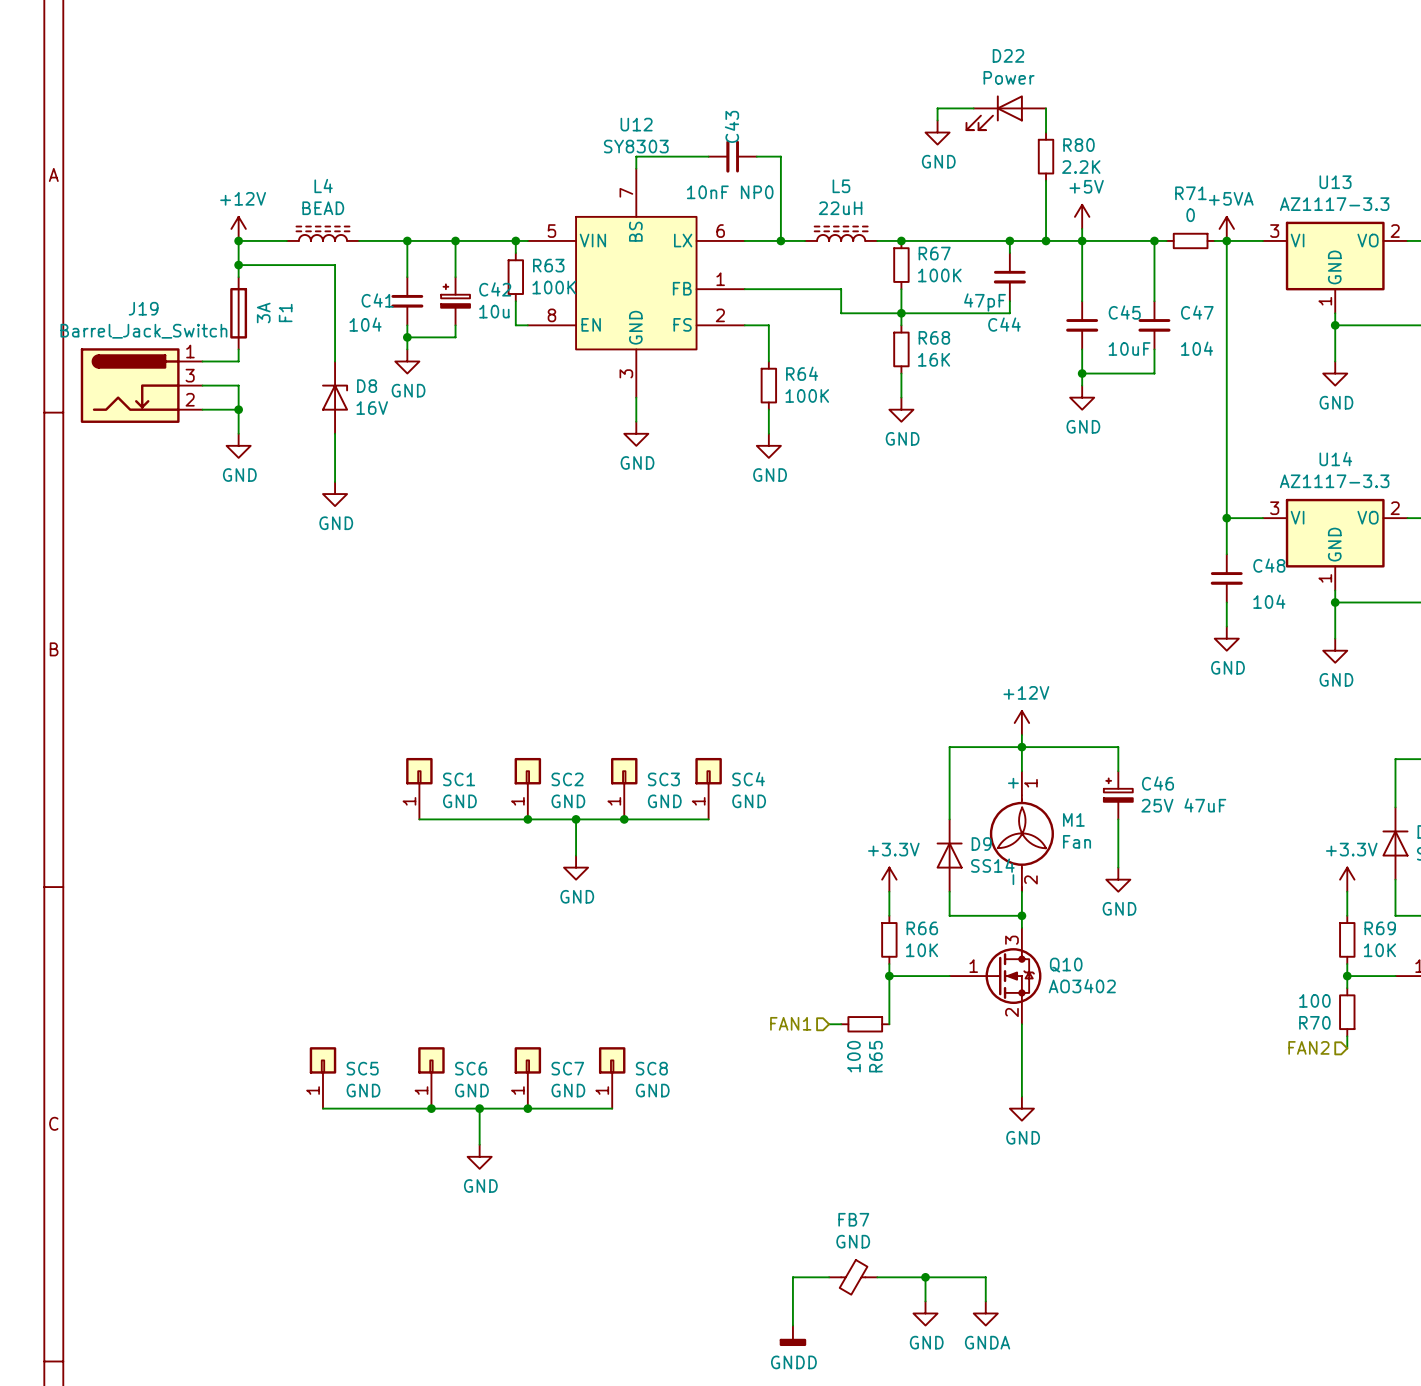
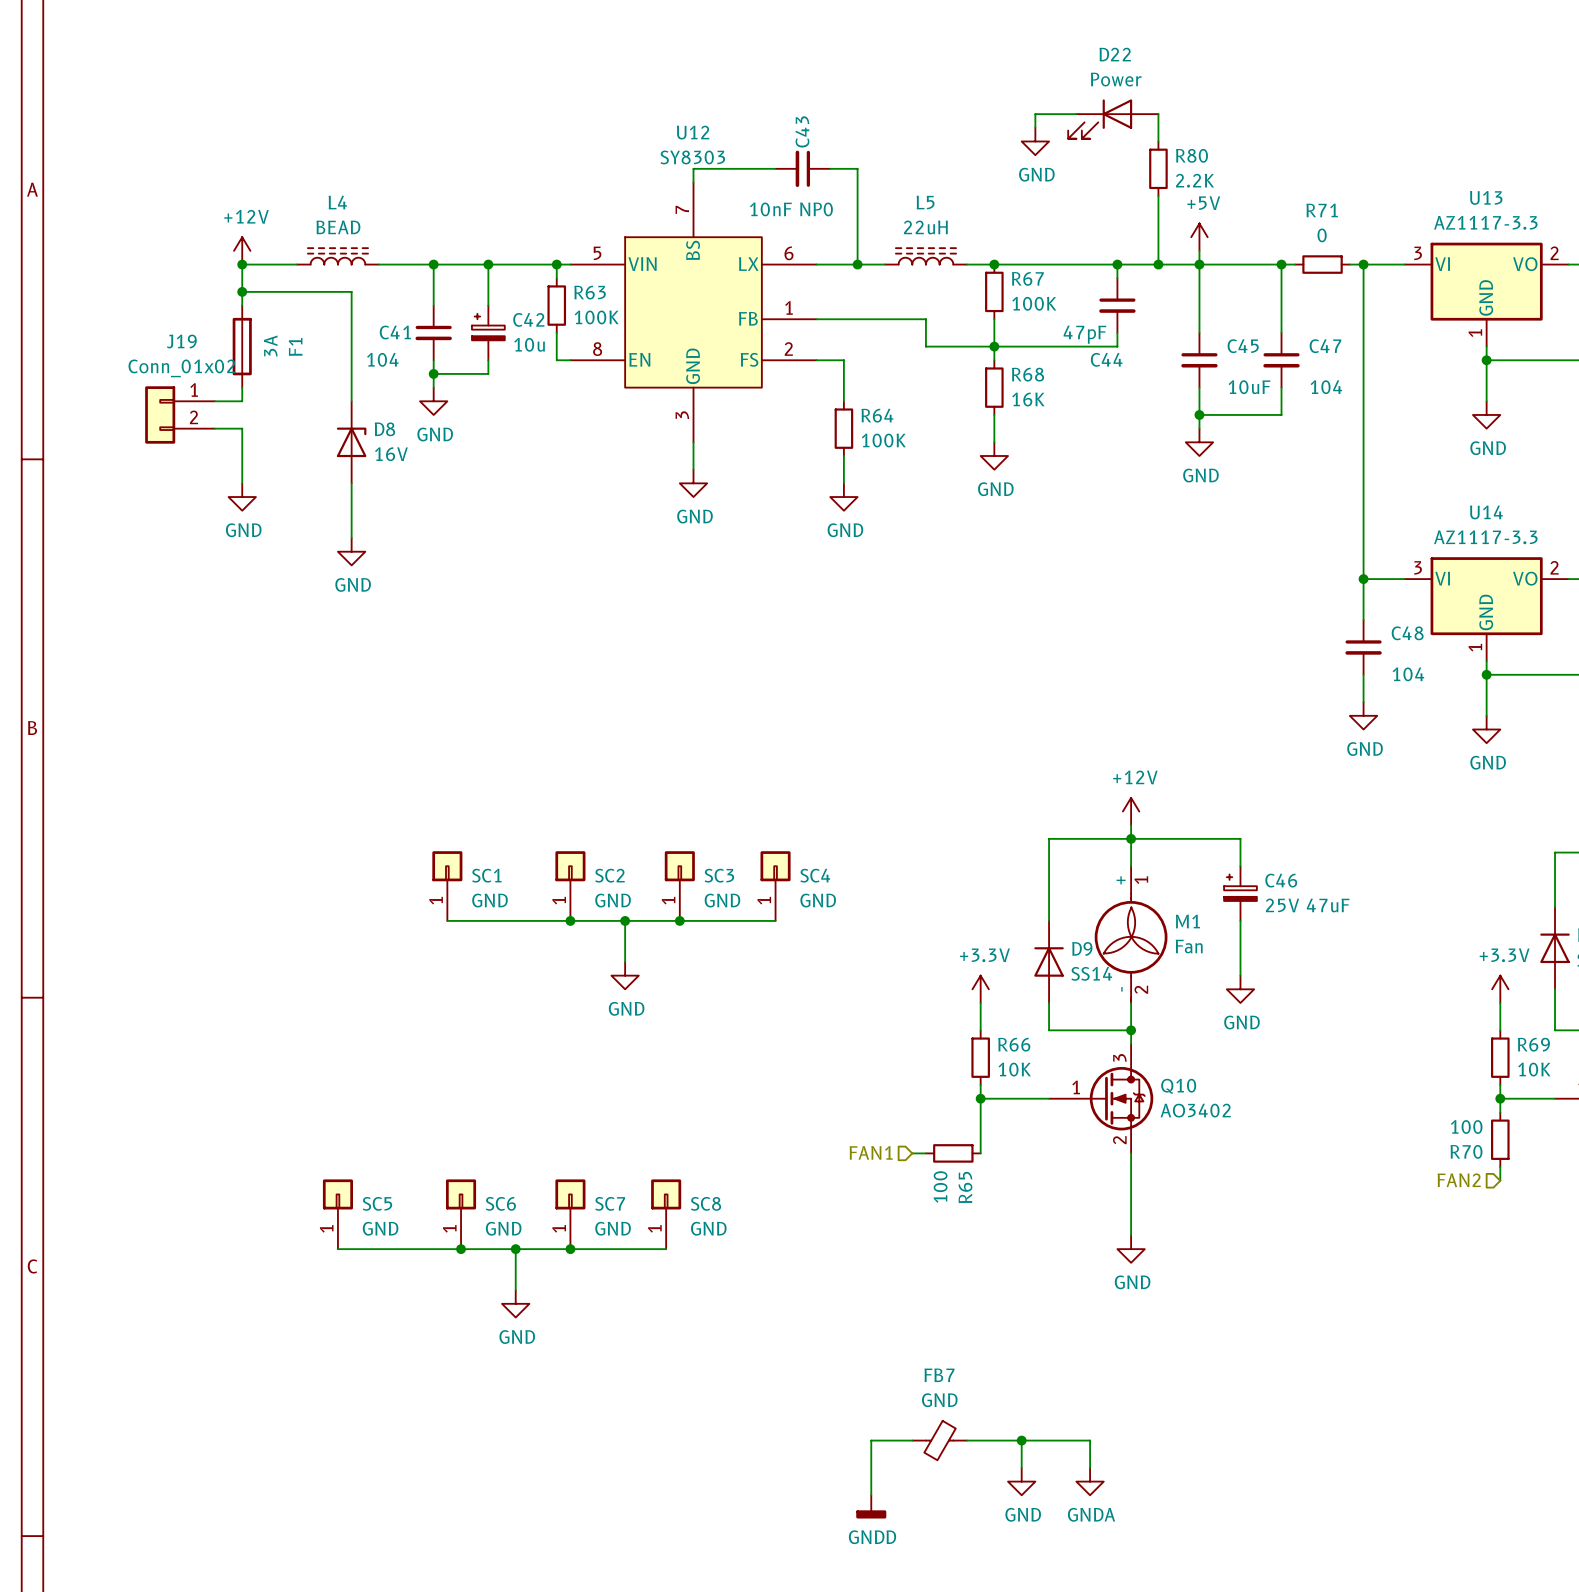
power symbol: +5VA (1226, 228) -> none
J19 value: Barrel_Jack_Switch (143, 331) -> Conn_01x02 (181, 368)
J19 symbol: [80, 348, 203, 423] -> [145, 386, 215, 444]
wire: (202, 409) (238, 409) -> none
junction: (238, 409) -> none

